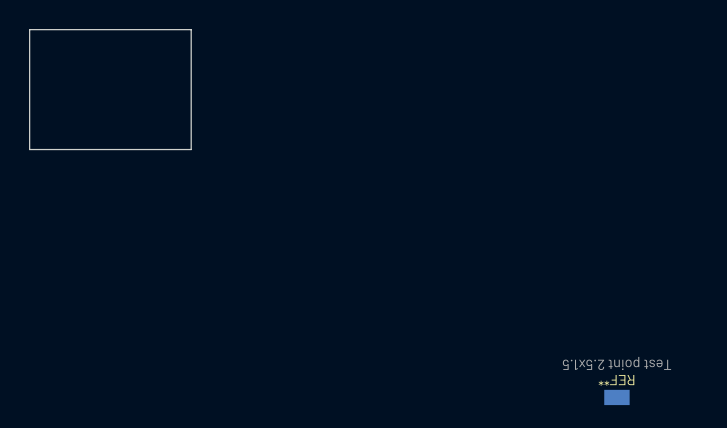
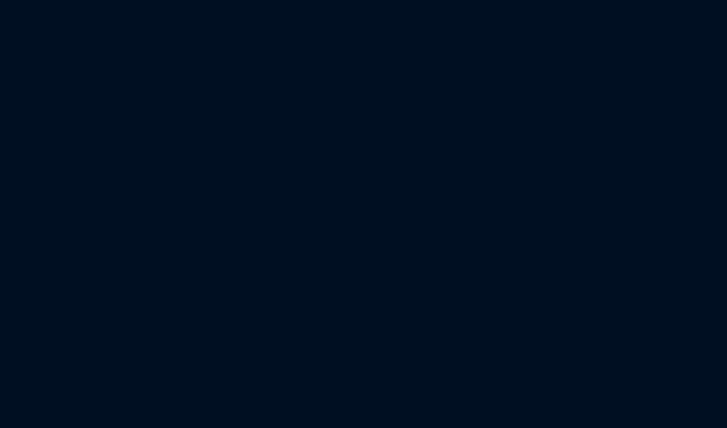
board edge: (191, 29) (29, 29) (29, 149) (191, 149) (191, 29) -> none
REF**: Test point 2.5x1.5 (616, 397) -> none

